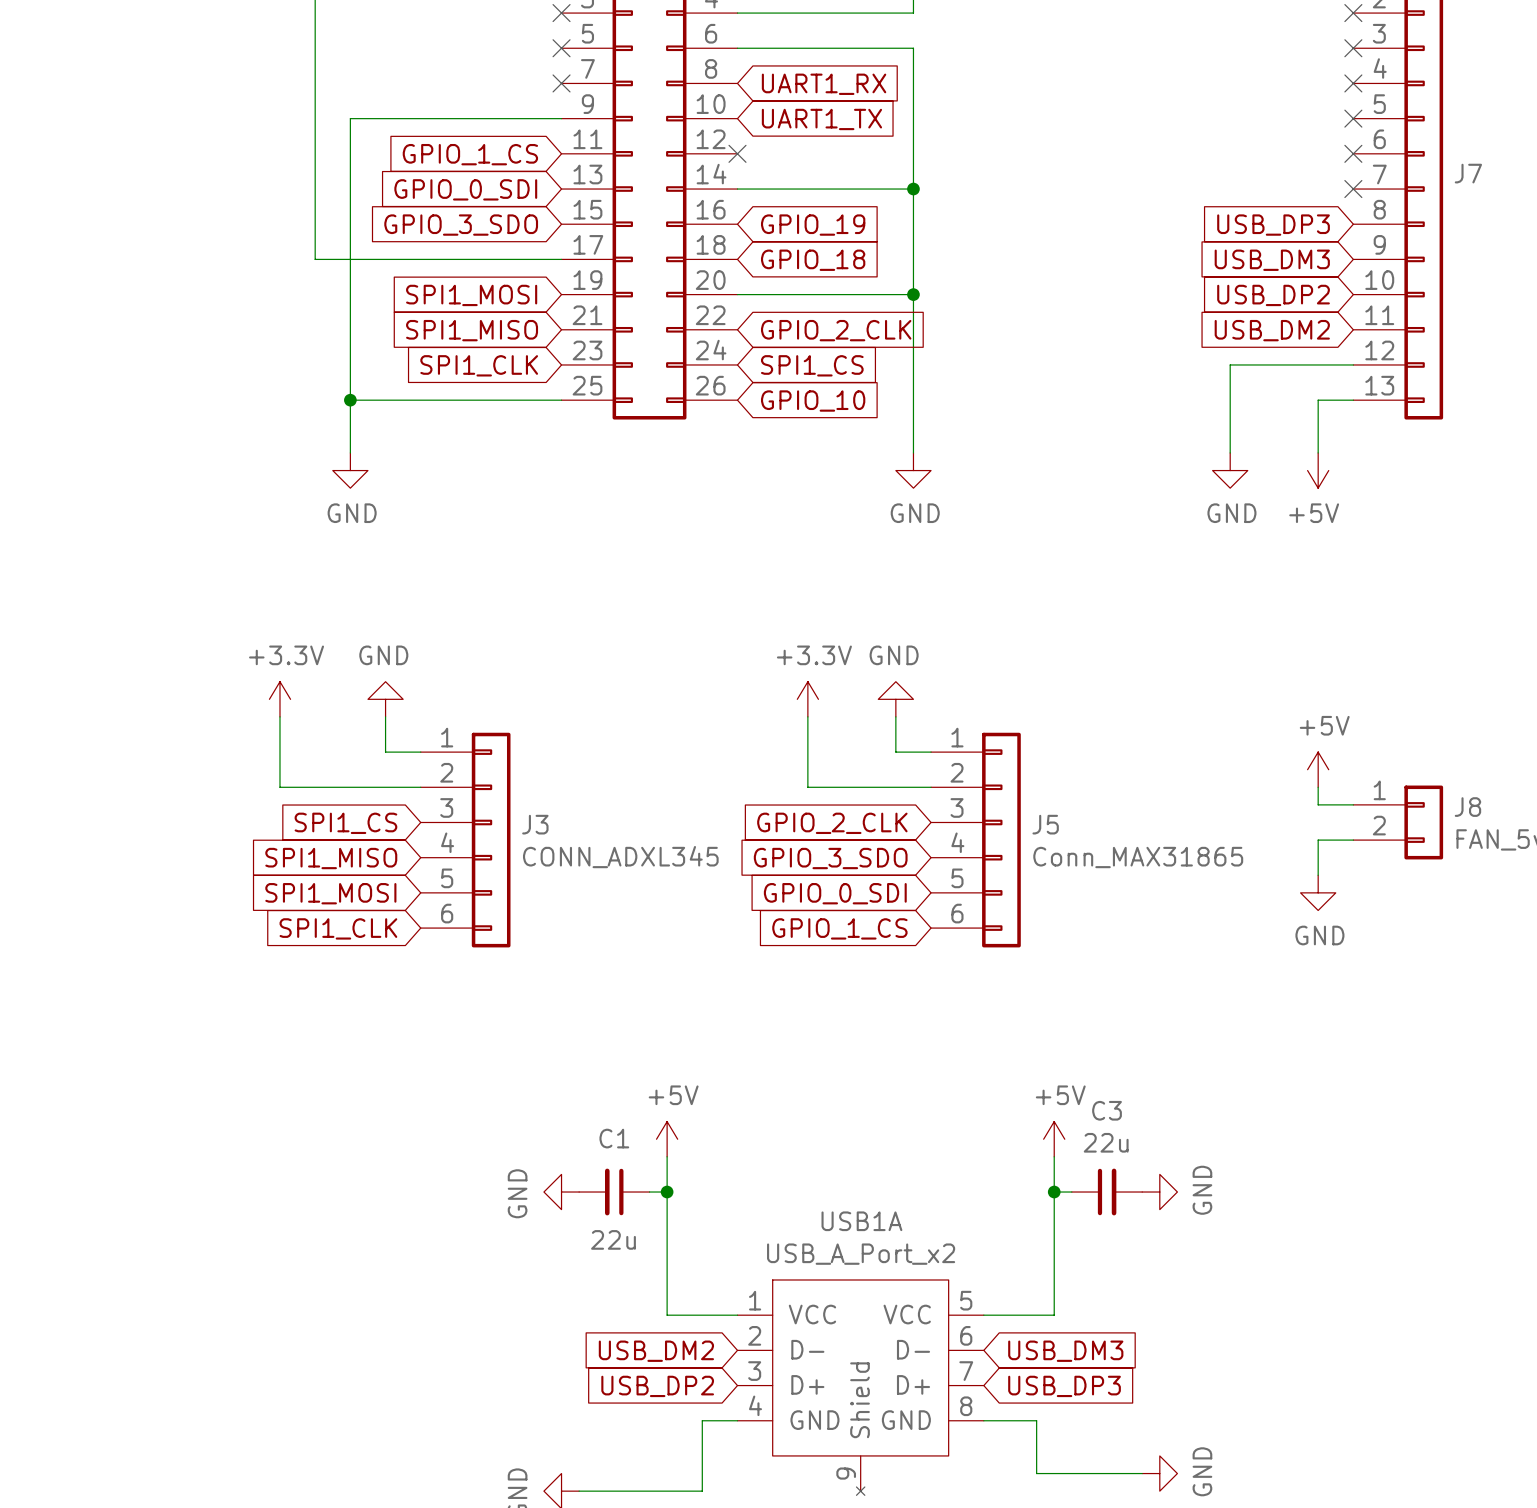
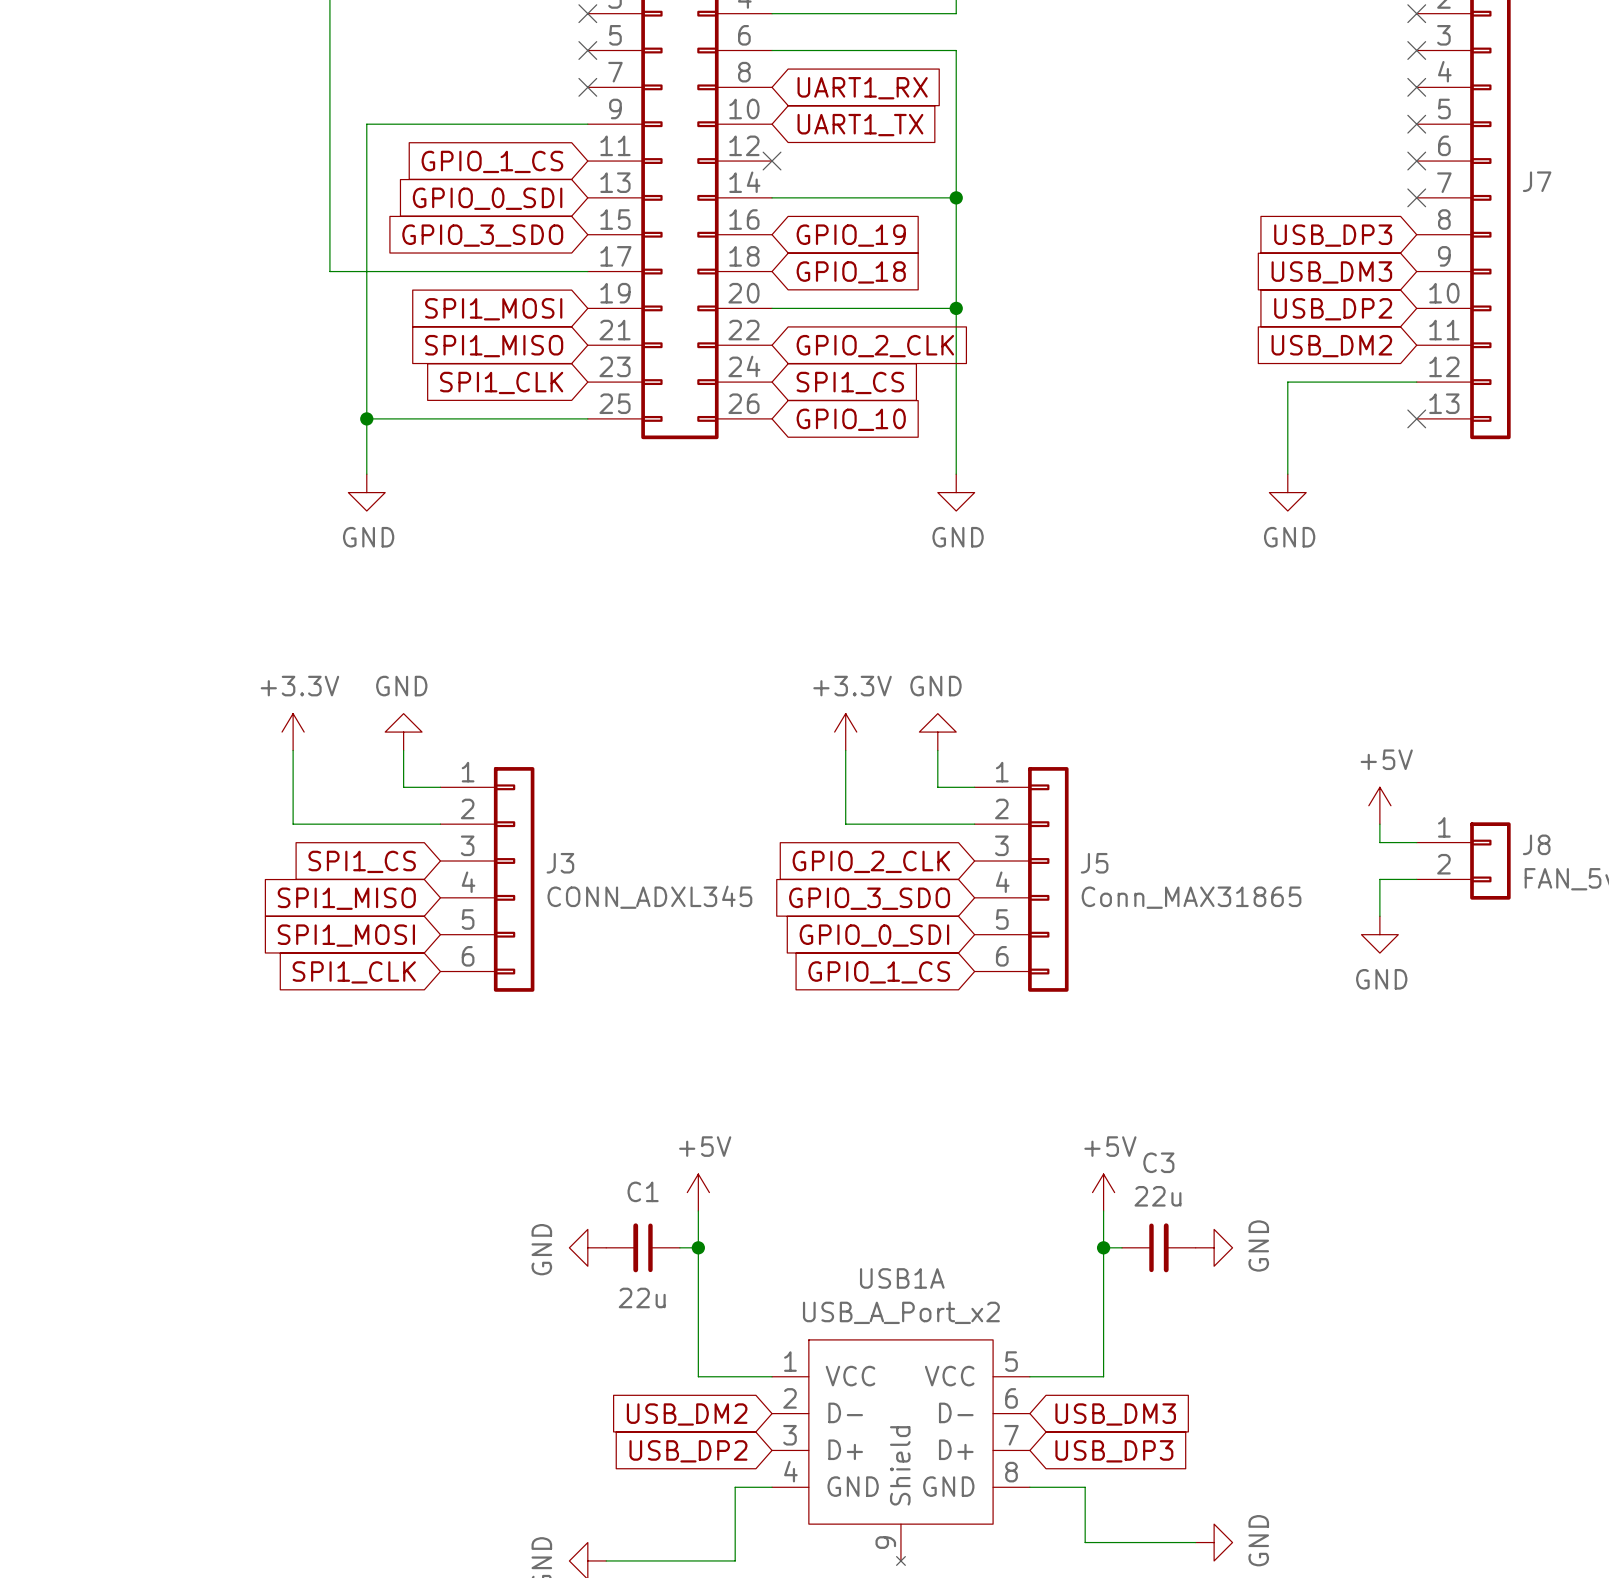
wire: (1353, 400) (1318, 400) (1318, 452) -> none
no-connect mark: none -> (1416, 418)
power symbol: +5V (1318, 470) -> none

